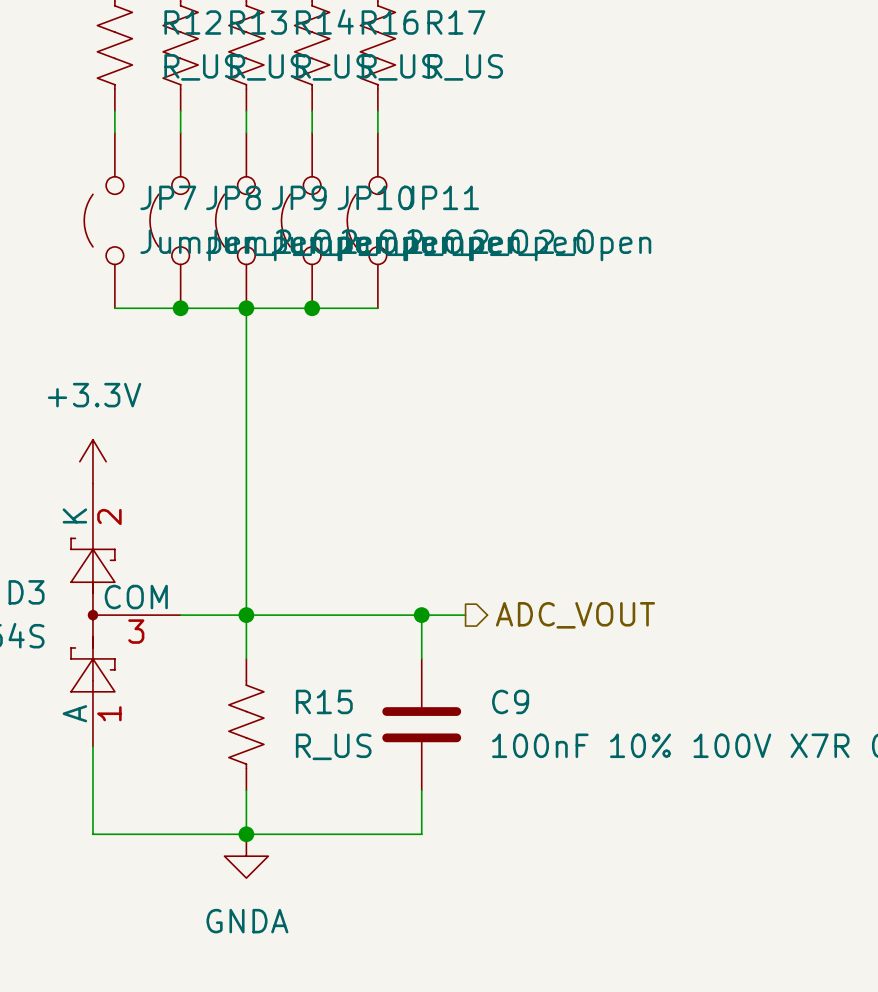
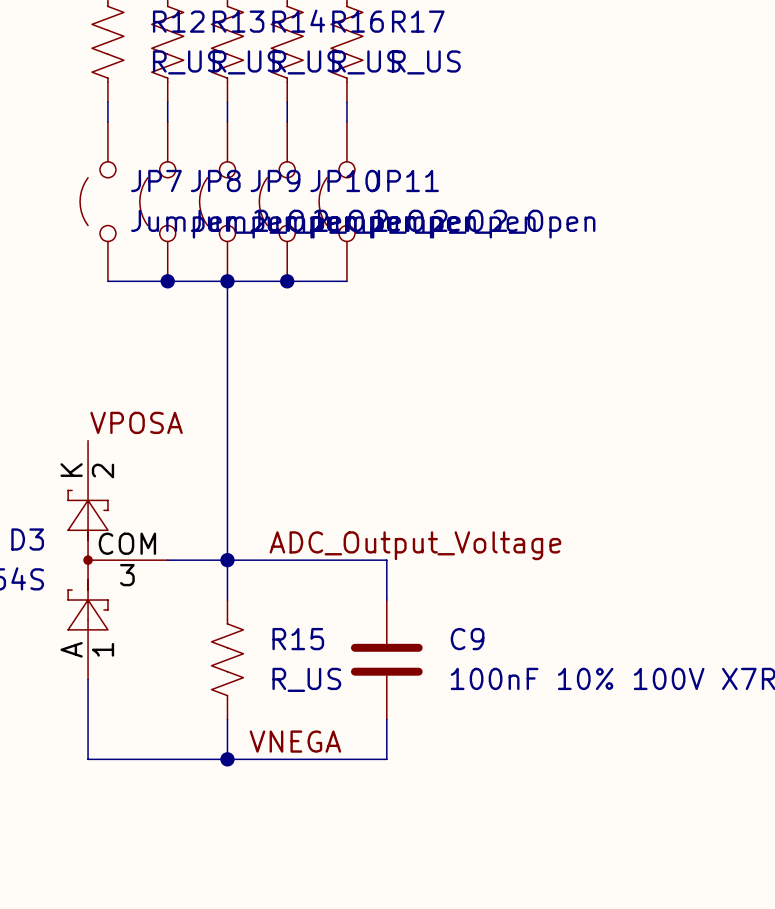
power symbol: +3.3V (92, 461) -> none
label: none -> VPOSA (136, 422)
label: none -> ADC_Output_Voltage (415, 545)
wire: (421, 615) (465, 615) -> none
junction: (421, 615) -> none
hierarchical label: ADC_VOUT (575, 615) -> none
label: none -> VNEGA (295, 741)
power symbol: GNDA (246, 856) -> none

